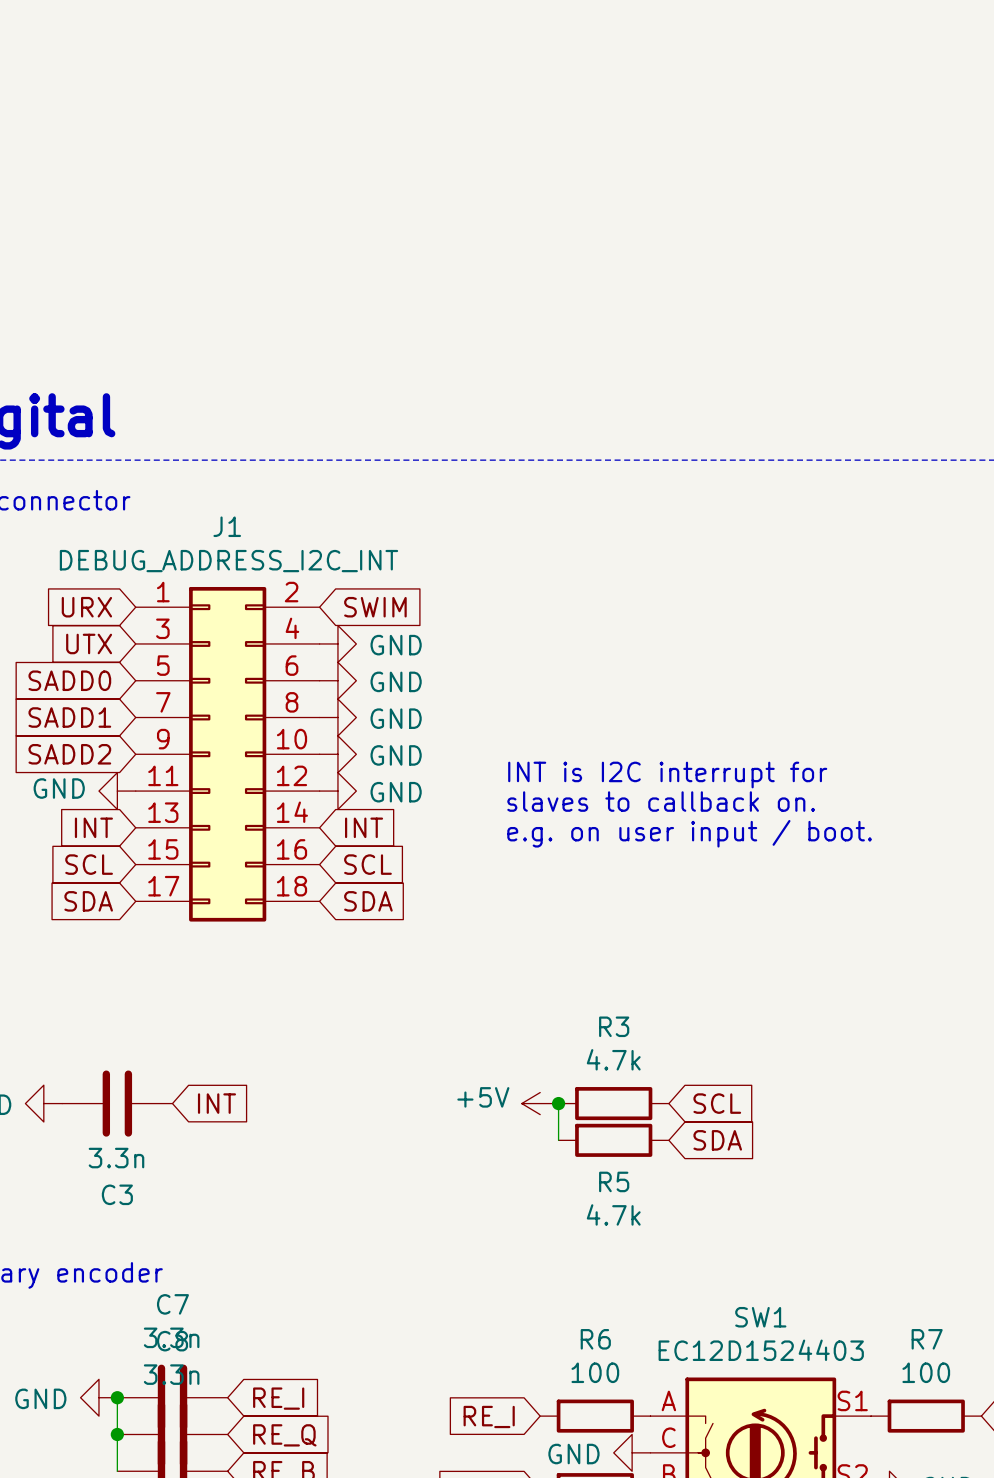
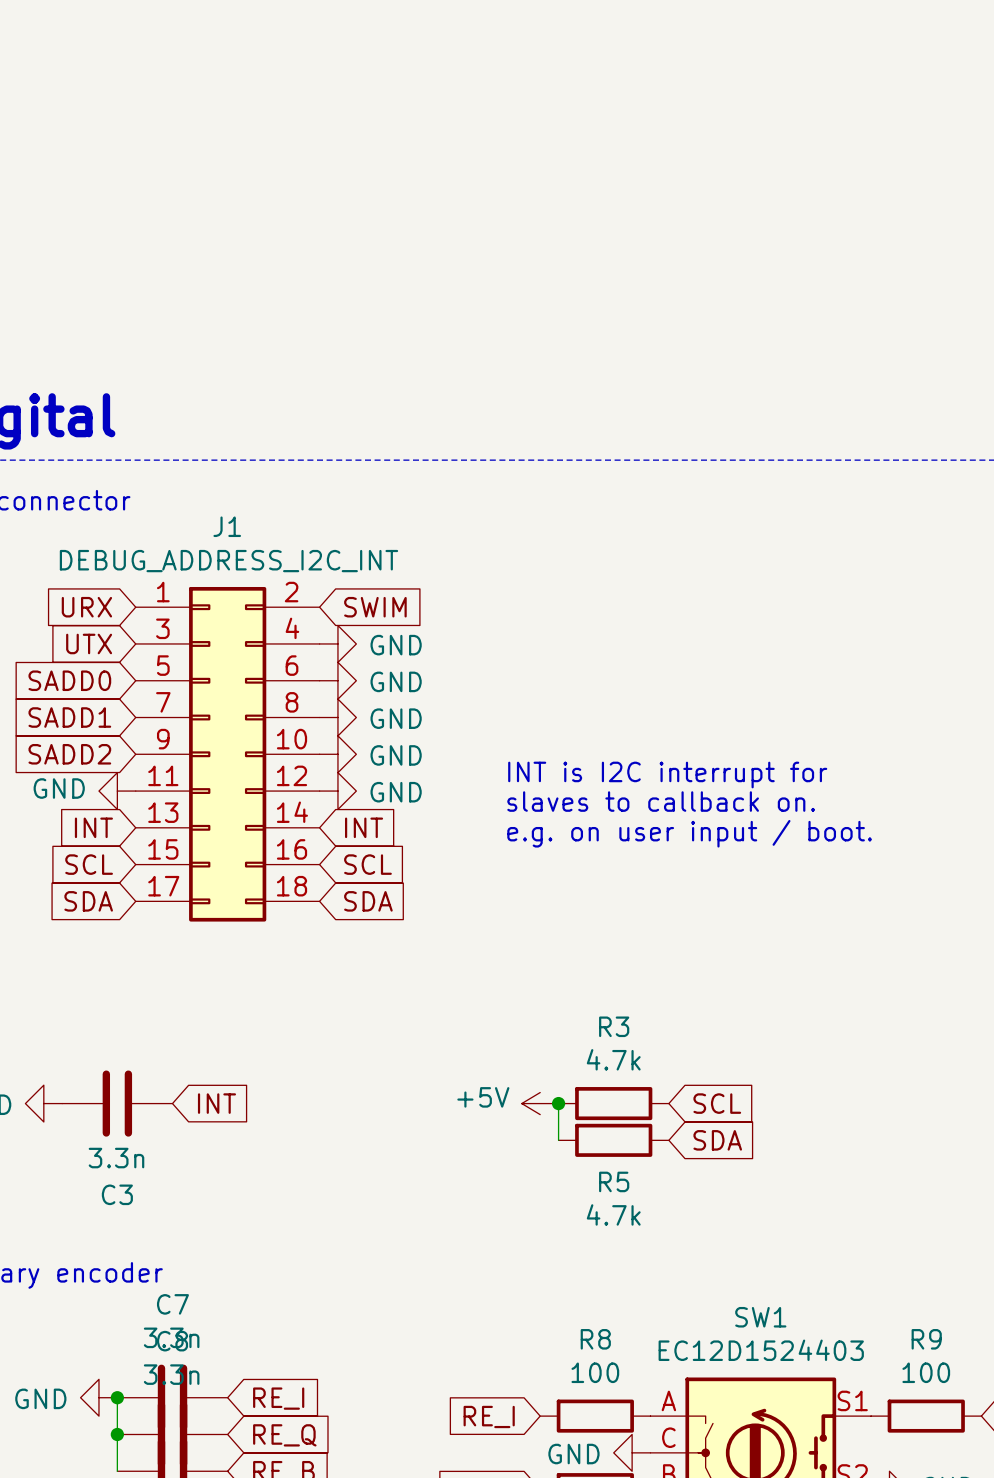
R6 name: R6 (595, 1339) -> R8 (595, 1339)
R7 name: R7 (927, 1339) -> R9 (926, 1339)

